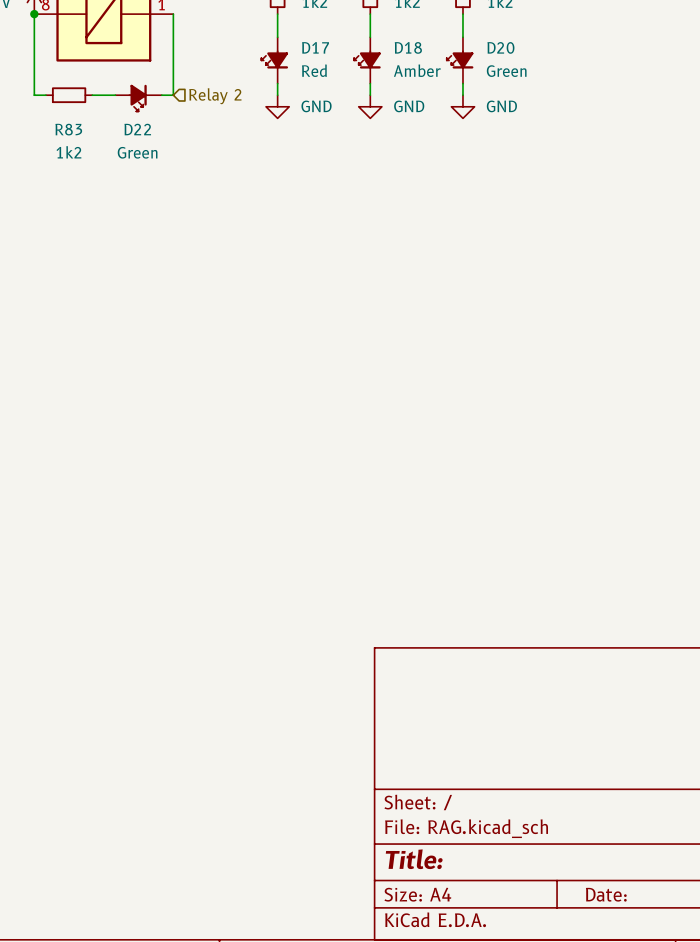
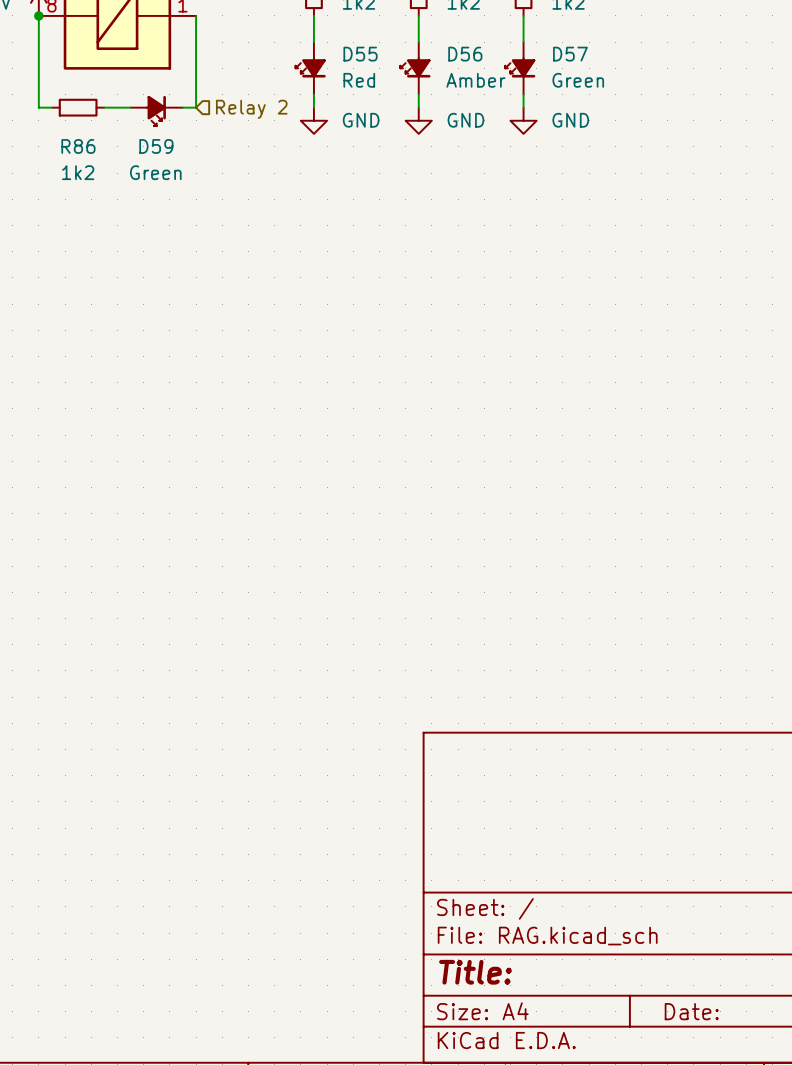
D17 name: D17 (315, 47) -> D55 (360, 54)
D18 name: D18 (408, 47) -> D56 (465, 54)
D20 name: D20 (500, 47) -> D57 (570, 54)
R83 name: R83 (68, 129) -> R86 (78, 146)
D22 name: D22 (137, 129) -> D59 (156, 146)

